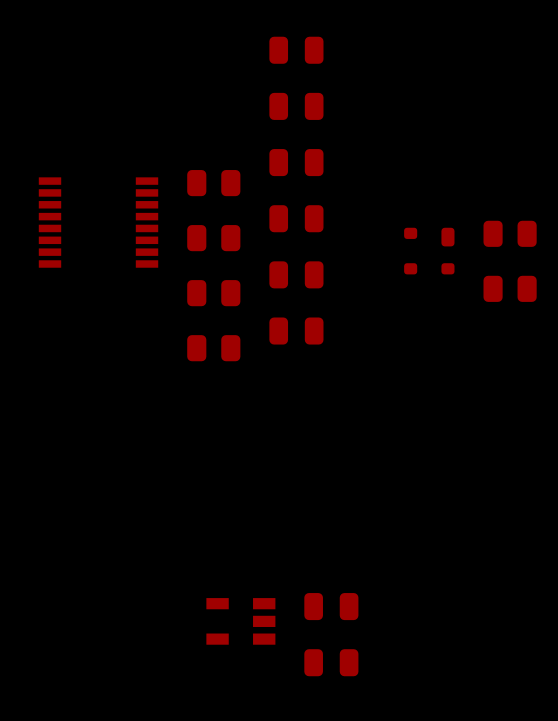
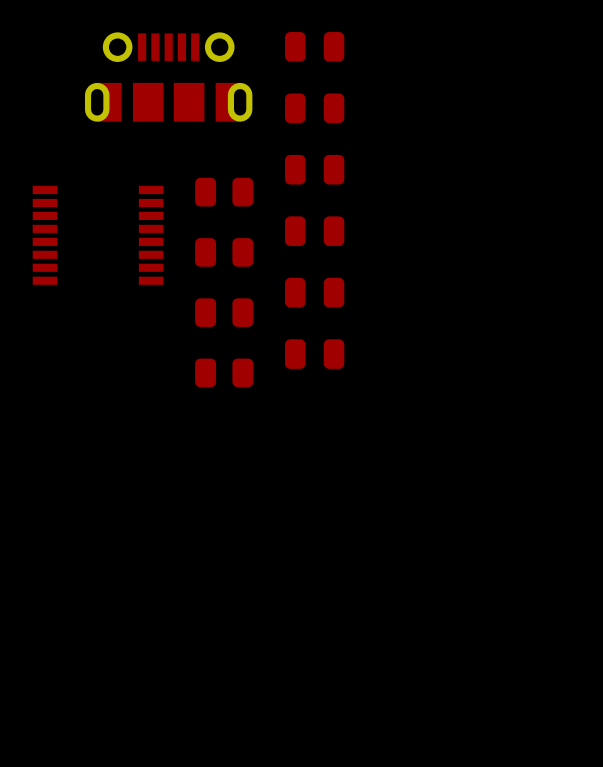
part: none -> (168, 77)
part: (510, 233) -> none
part: (429, 251) -> none
part: (510, 288) -> none
part: (331, 606) -> none
part: (240, 621) -> none
part: (331, 662) -> none

